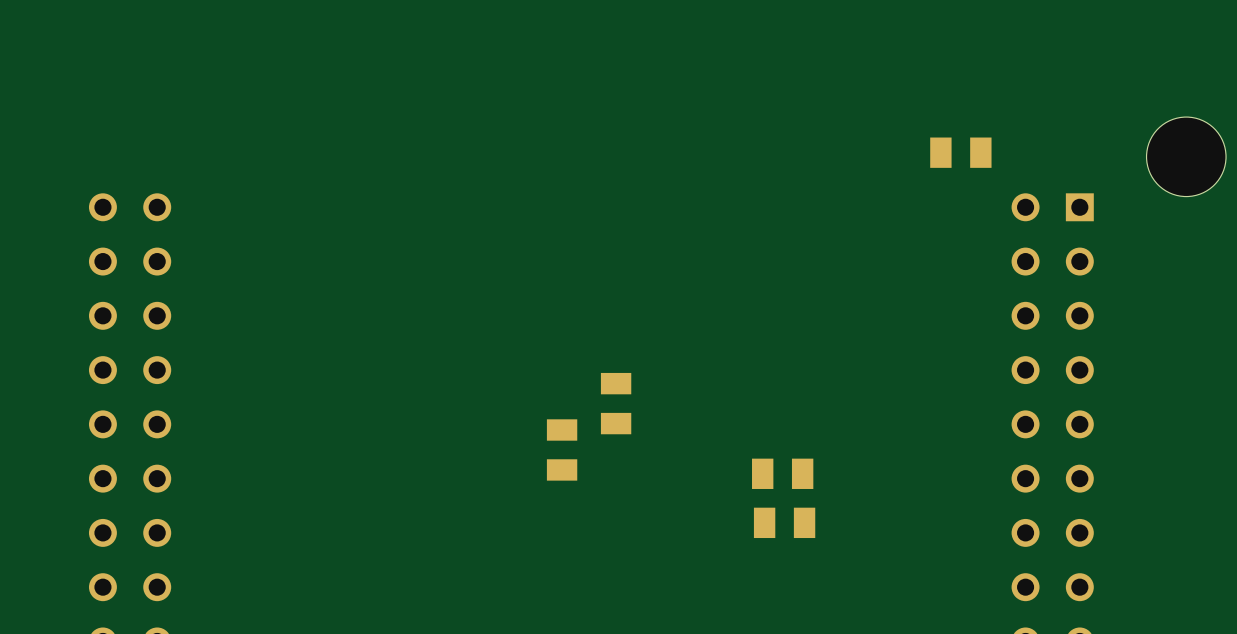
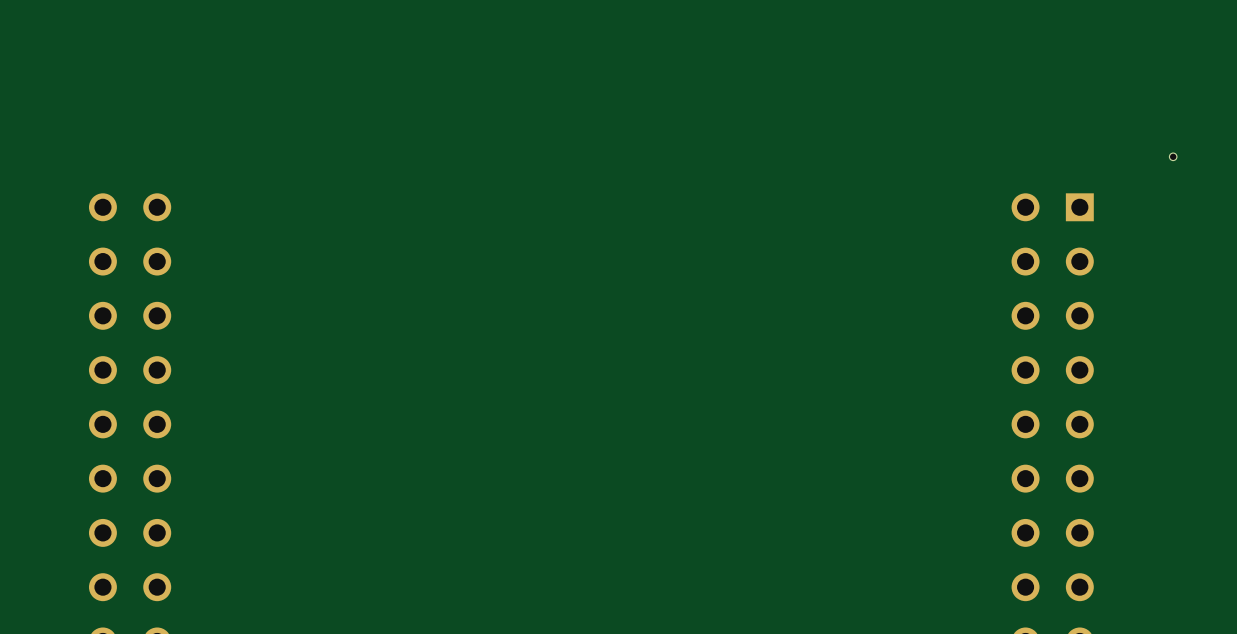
hole size: [1146, 117, 1227, 197] -> [1169, 153, 1177, 161]
part: (960, 152) -> none
part: (616, 403) -> none
part: (562, 449) -> none
part: (782, 473) -> none
part: (784, 522) -> none

